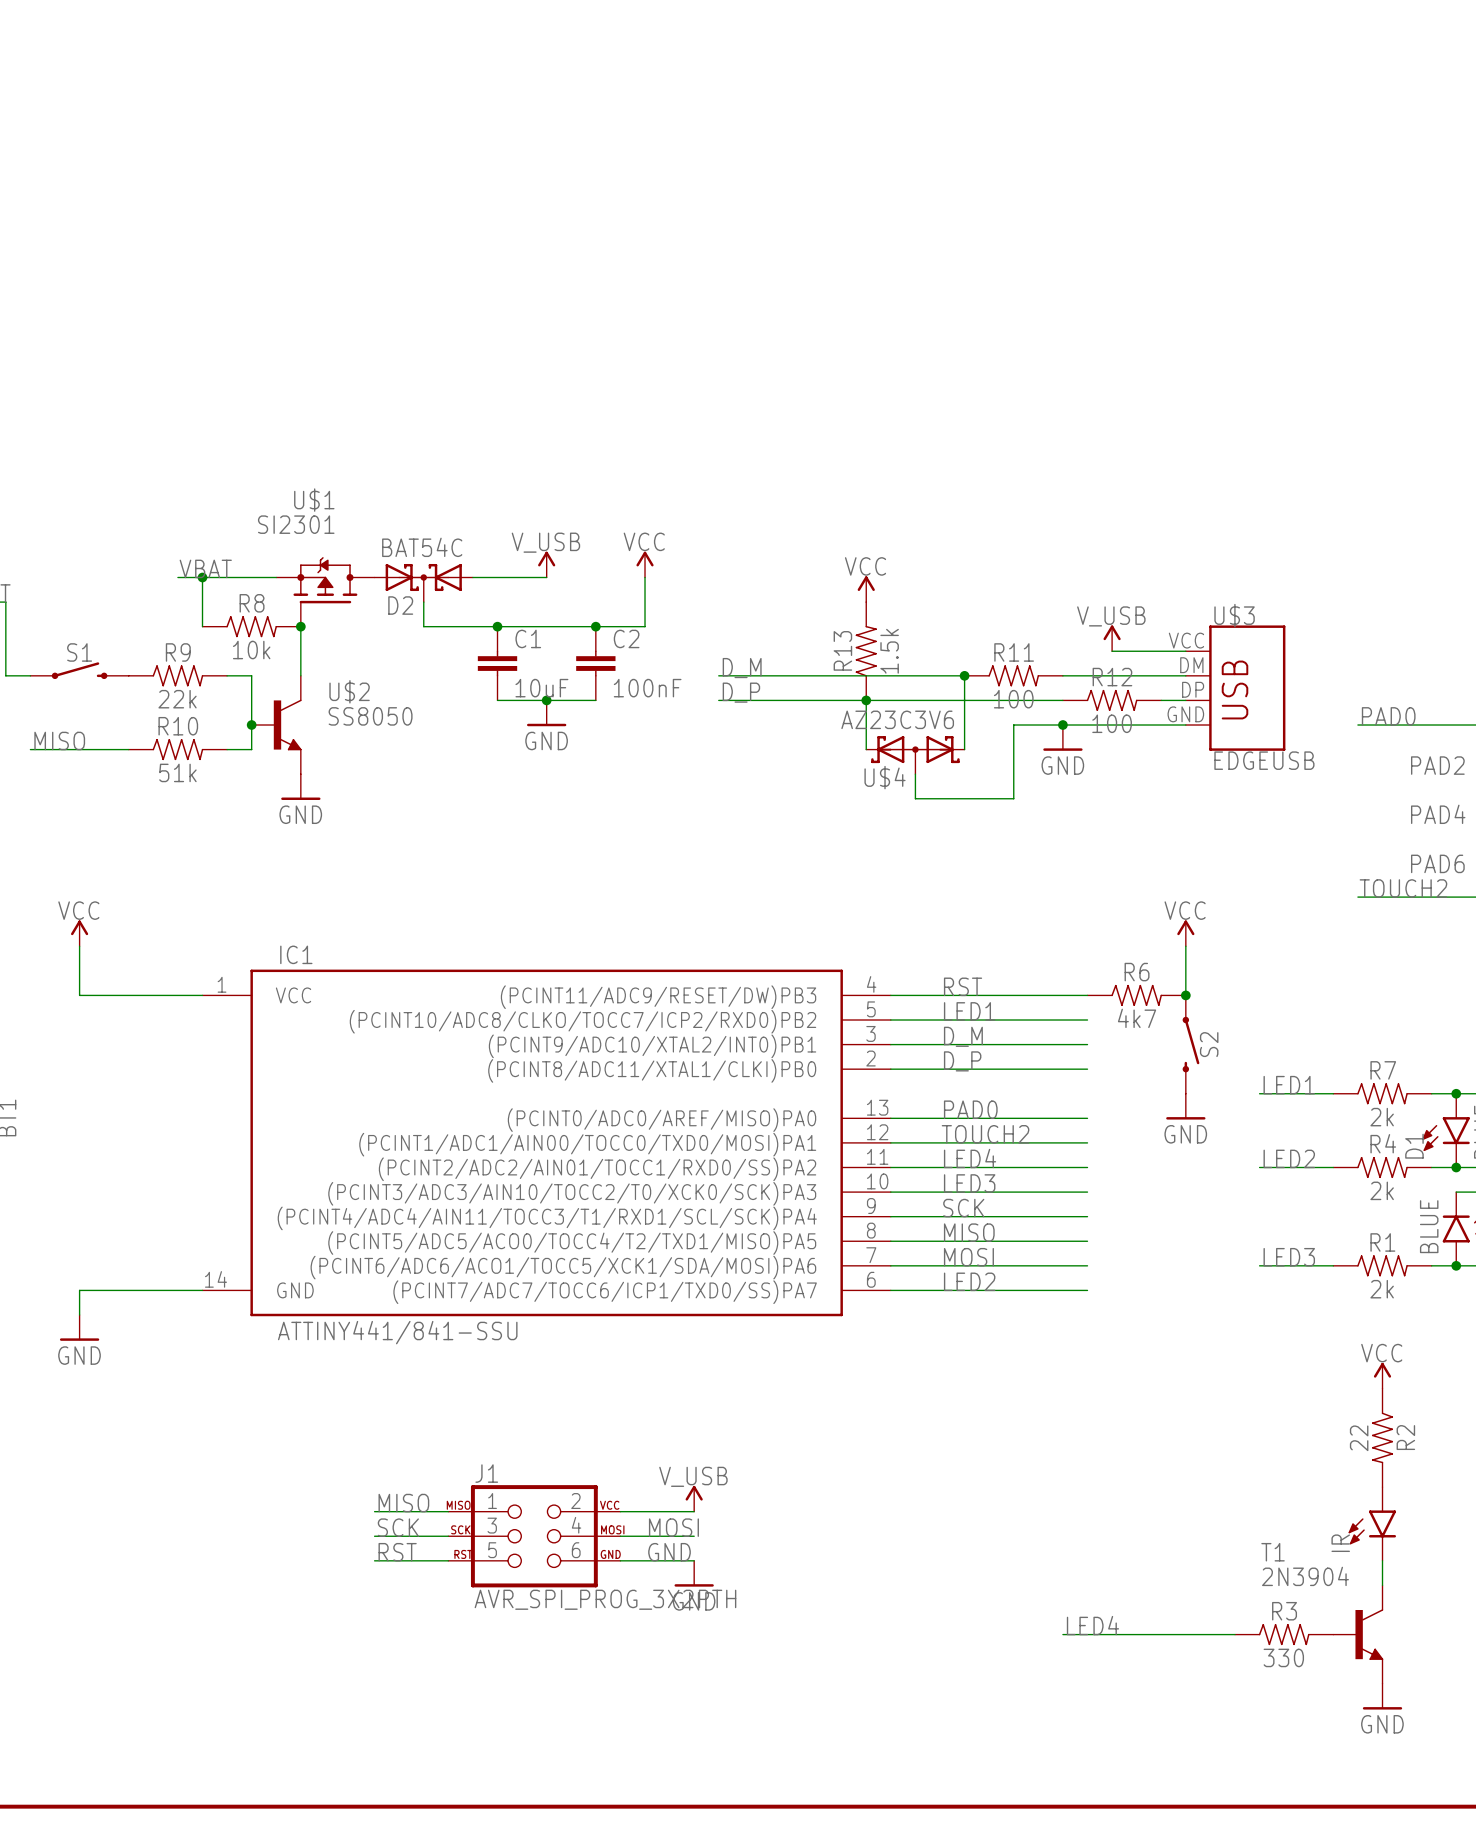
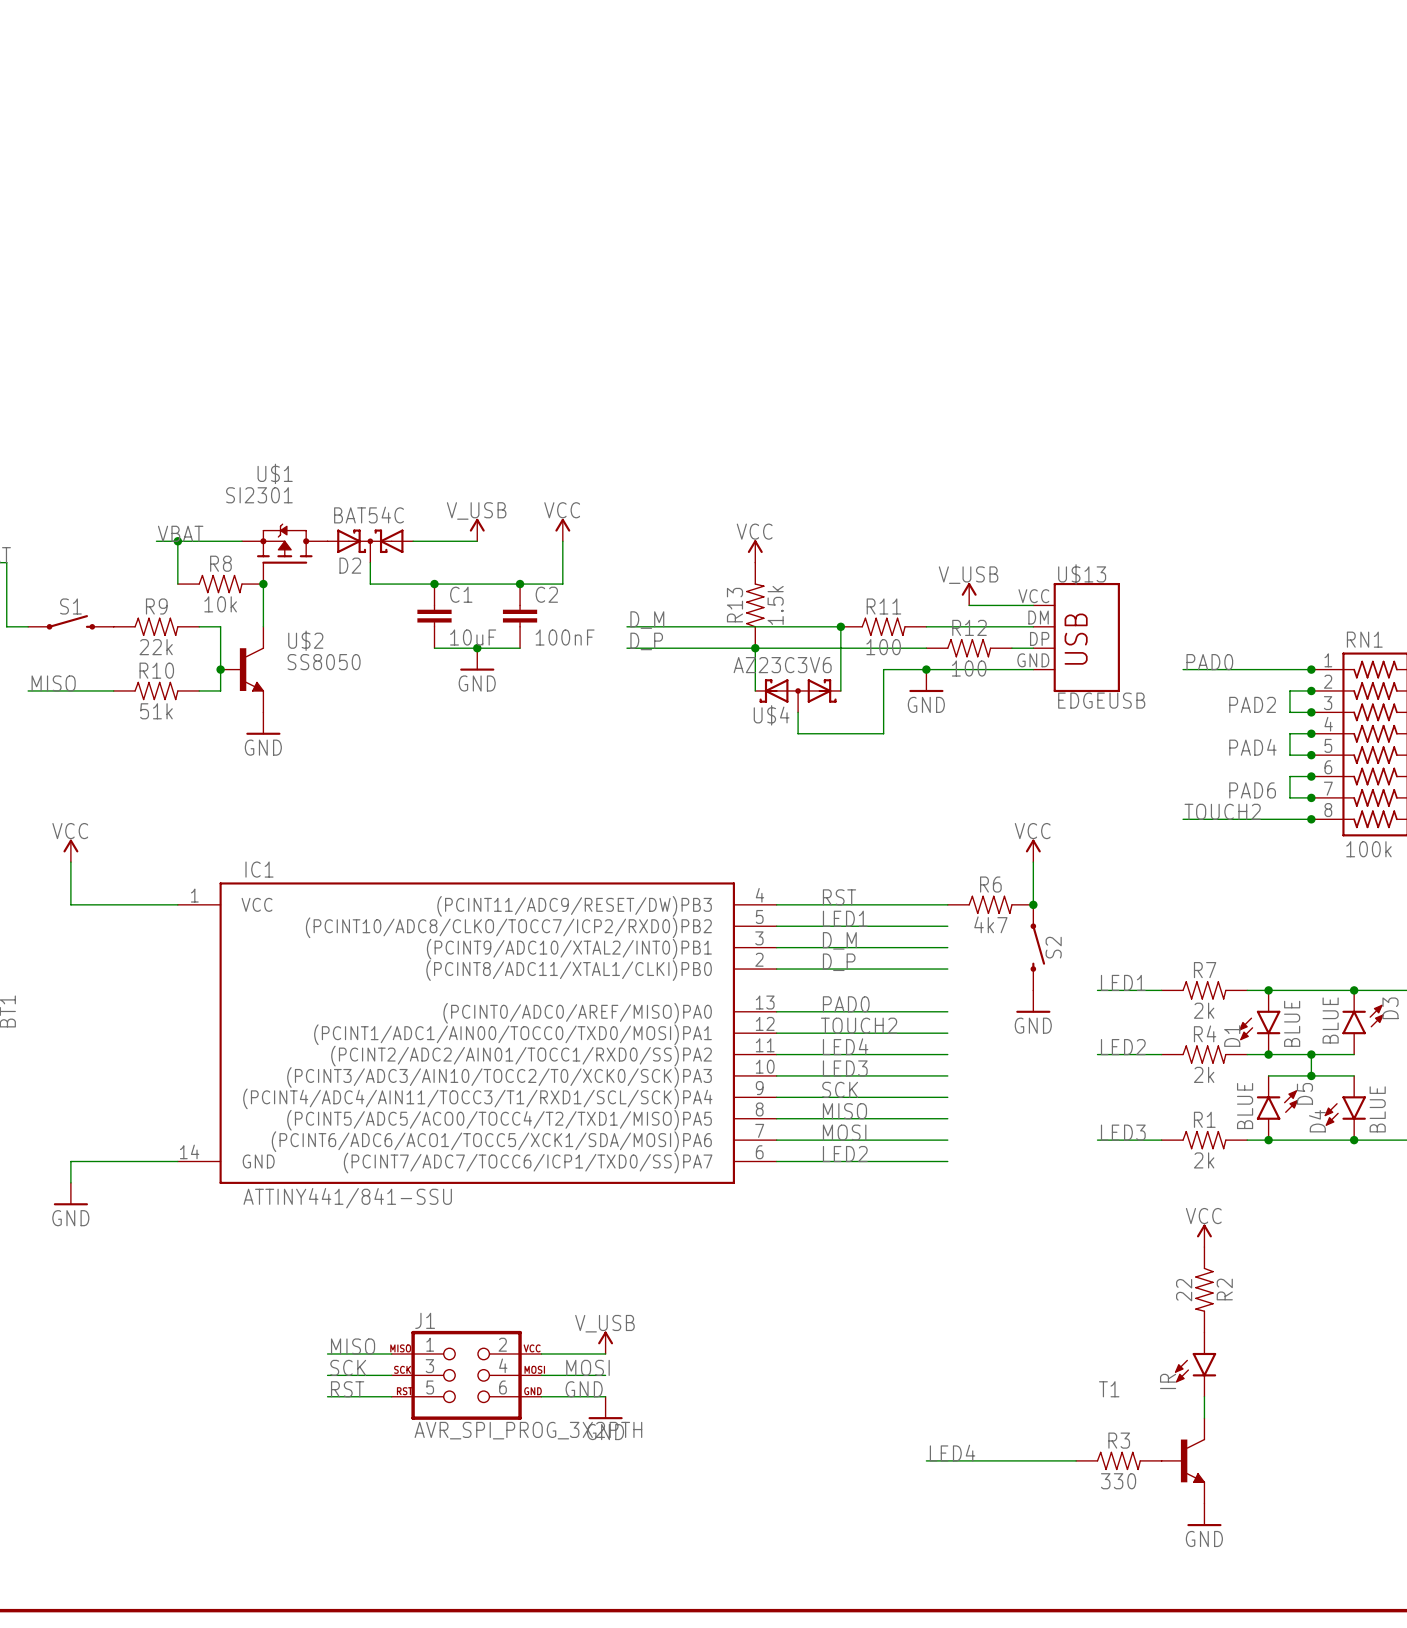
U$3 name: U$3 (1234, 615) -> U$13 (1082, 574)
T1 value: 2N3904 (1305, 1576) -> none

